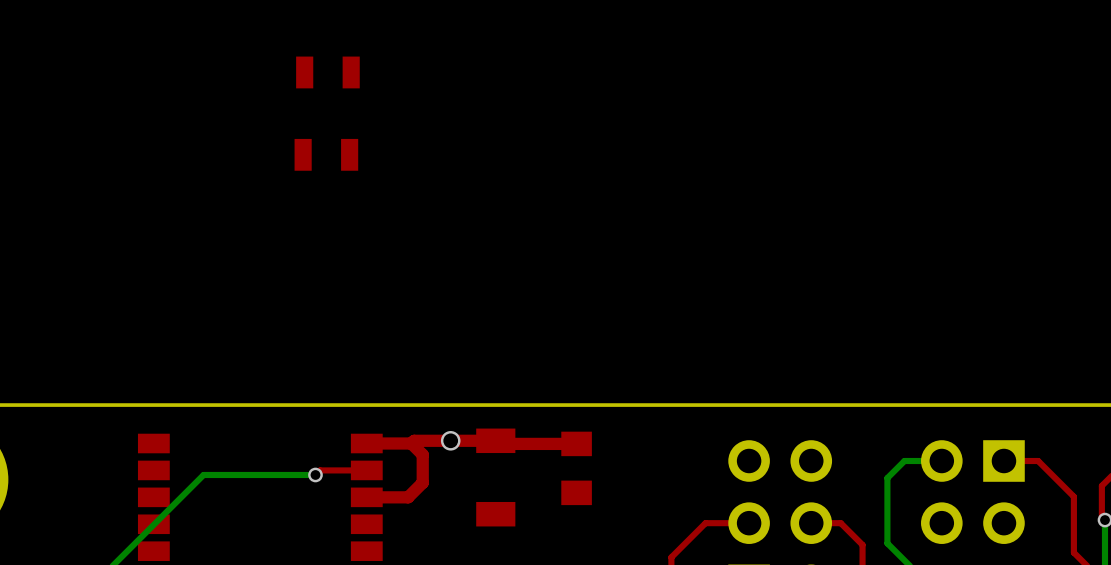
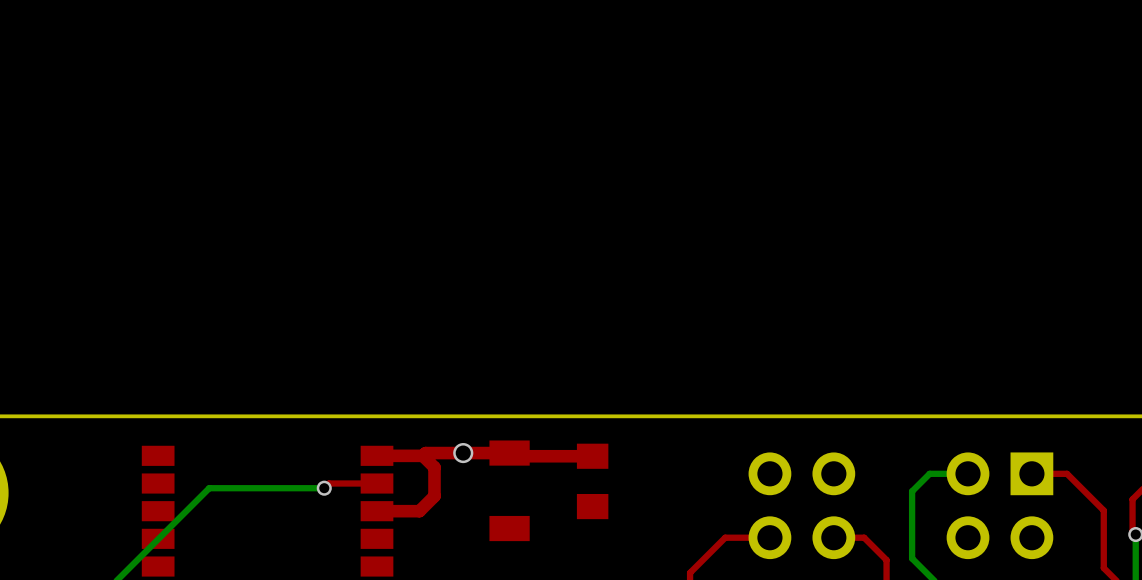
part: (327, 72) -> none
part: (326, 154) -> none

